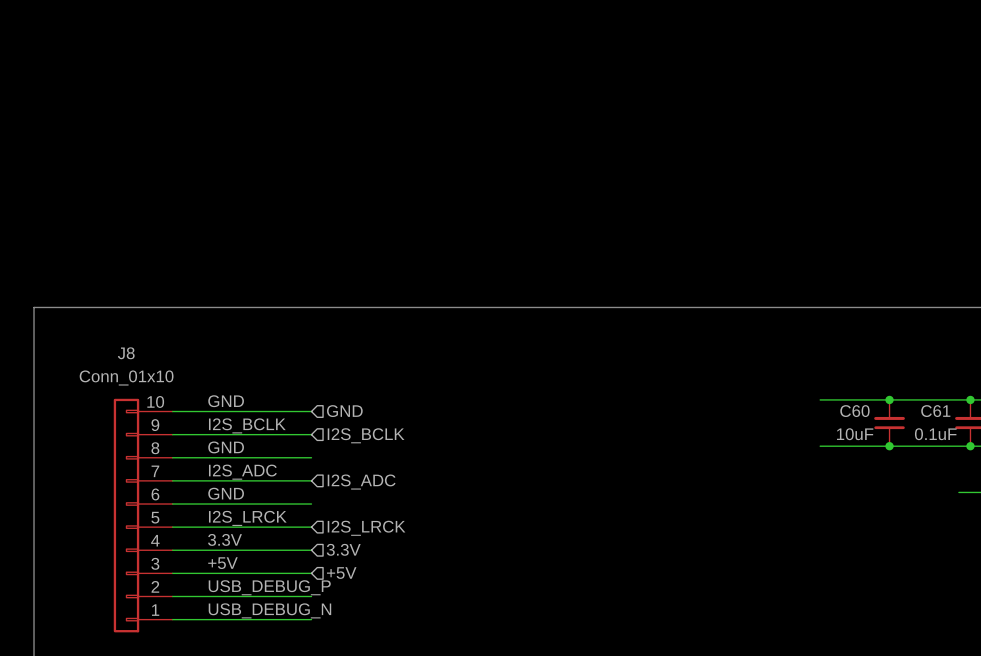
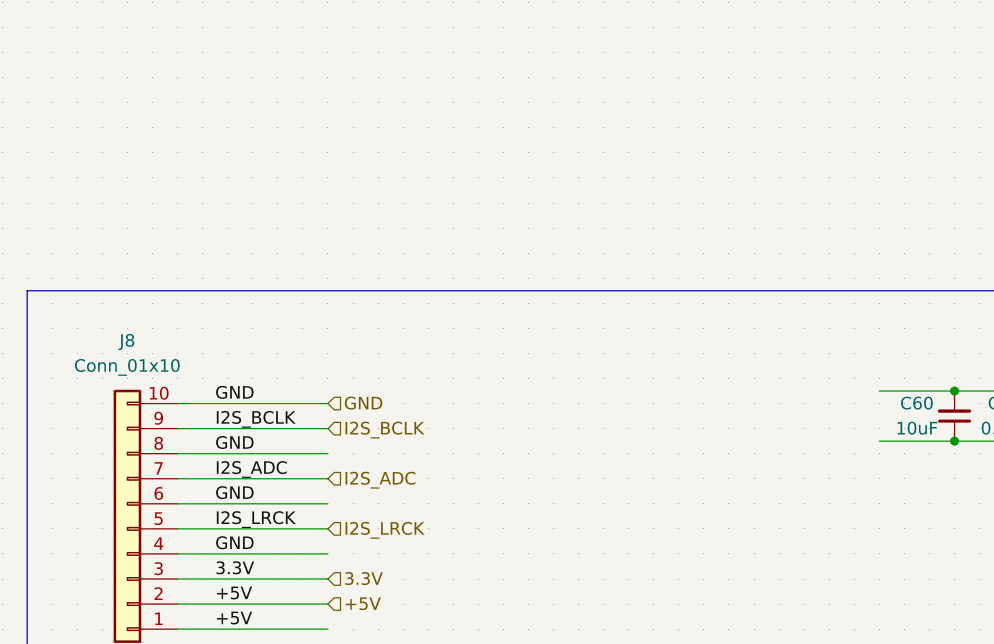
label: 3.3V (224, 539) -> GND (234, 542)
hierarchical label: 3.3V (343, 549) -> none
label: +5V (222, 563) -> 3.3V (235, 567)
hierarchical label: +5V (341, 573) -> 3.3V (363, 578)
label: USB_DEBUG_P (269, 587) -> +5V (234, 593)
hierarchical label: none -> +5V (363, 603)
label: USB_DEBUG_N (269, 610) -> +5V (234, 618)

